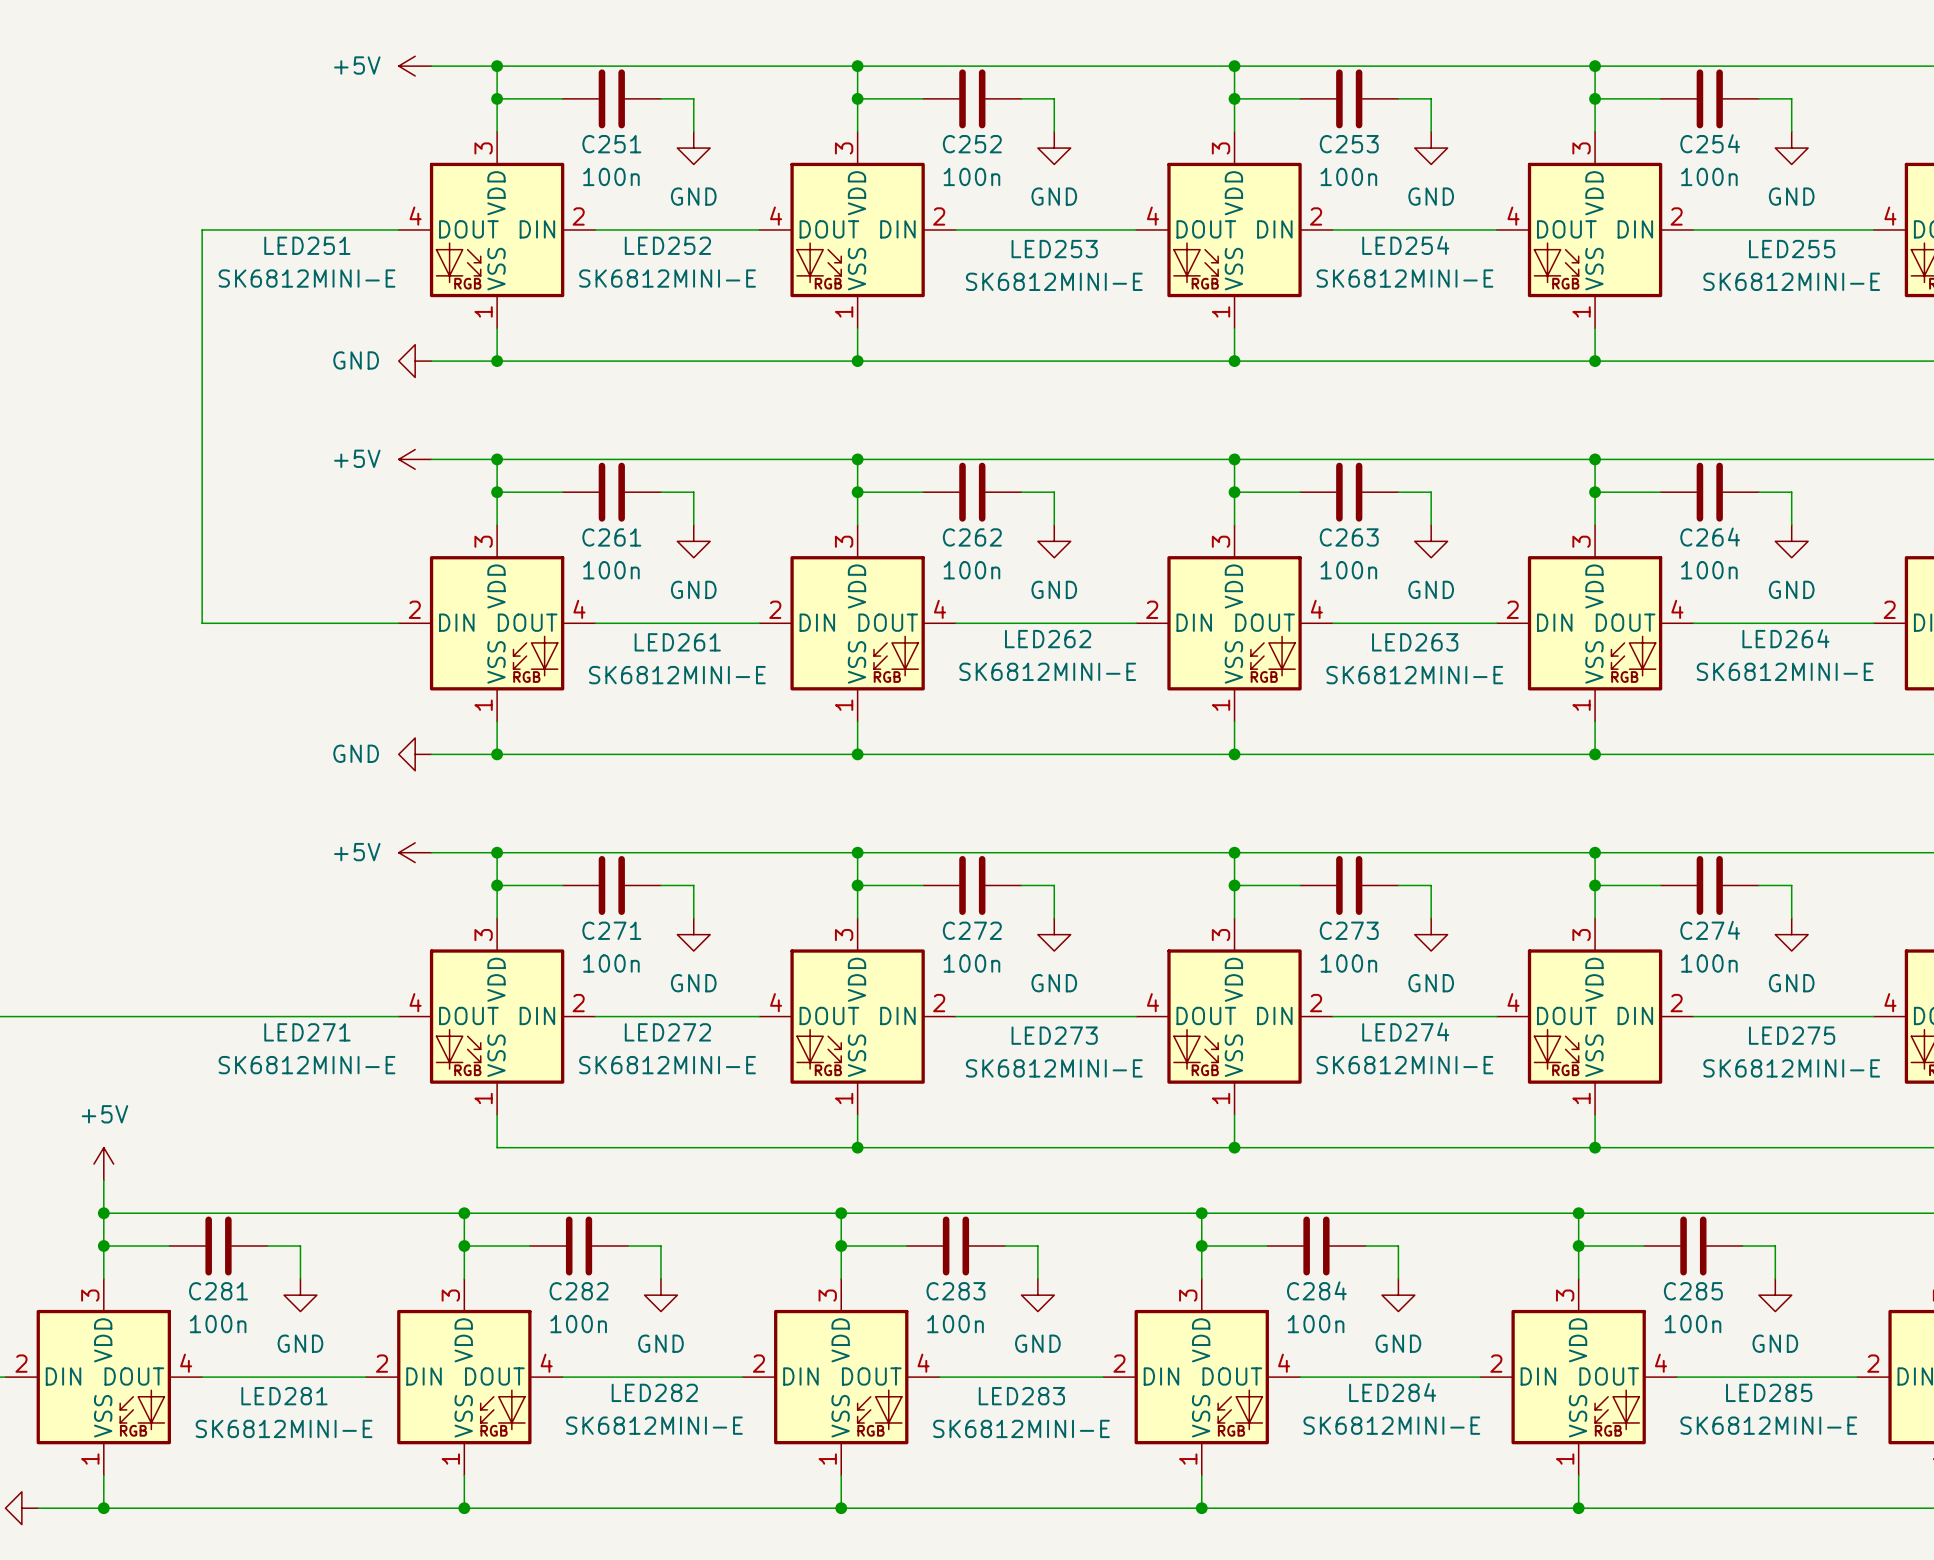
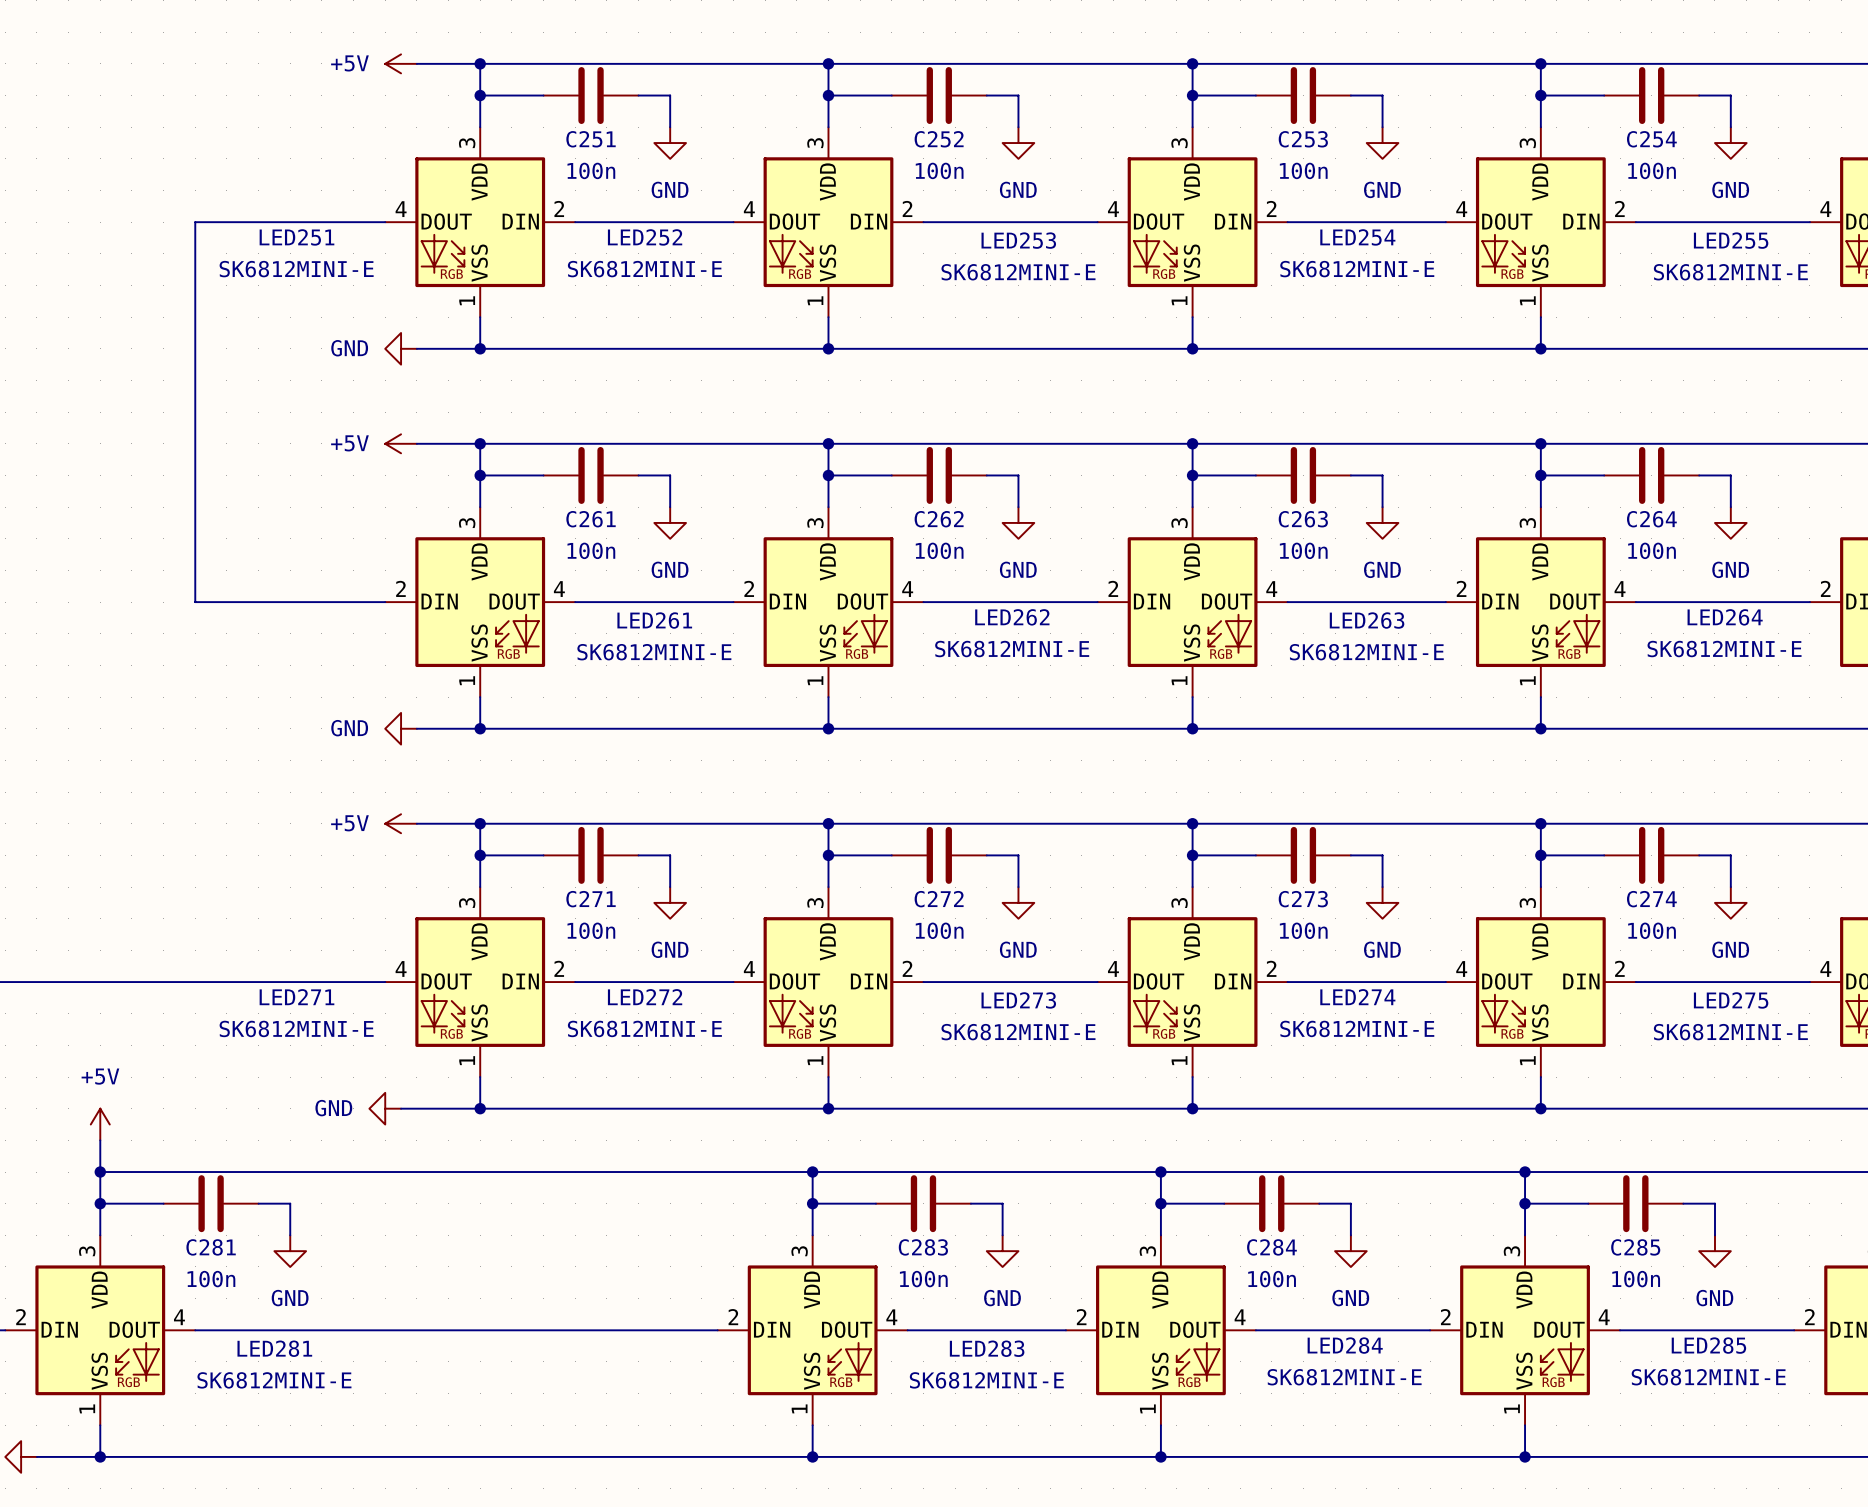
wire: none -> (401, 1108) (480, 1108)
junction: none -> (480, 1108)
wire: (464, 1213) (464, 1278) -> none
junction: (464, 1213) -> none
wire: (464, 1246) (529, 1246) -> none
junction: (464, 1246) -> none
C282: 100n (579, 1246) -> none
wire: (628, 1246) (660, 1246) (660, 1278) -> none
power symbol rotation: 0° (660, 1295) -> 90° clockwise (385, 1108)
power symbol position: GND (660, 1295) -> GND (385, 1108)
LED282: SK6812MINI-E (464, 1377) -> none
wire: (464, 1475) (464, 1508) -> none
junction: (464, 1508) -> none

